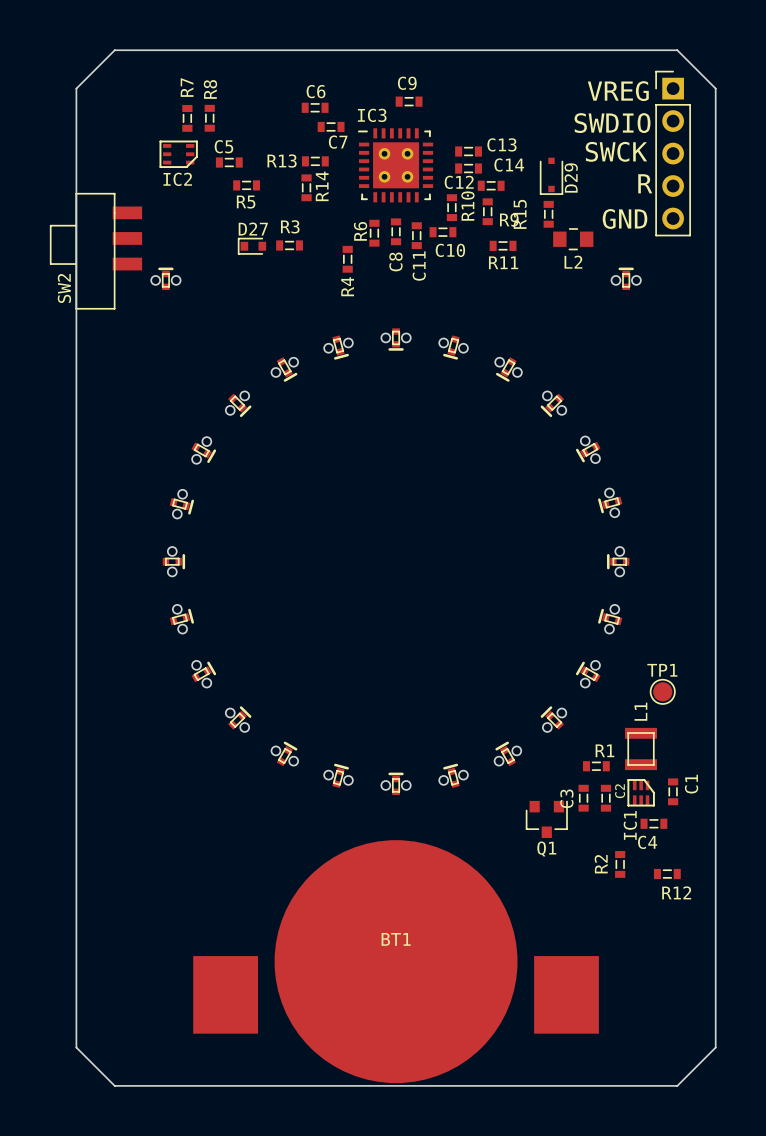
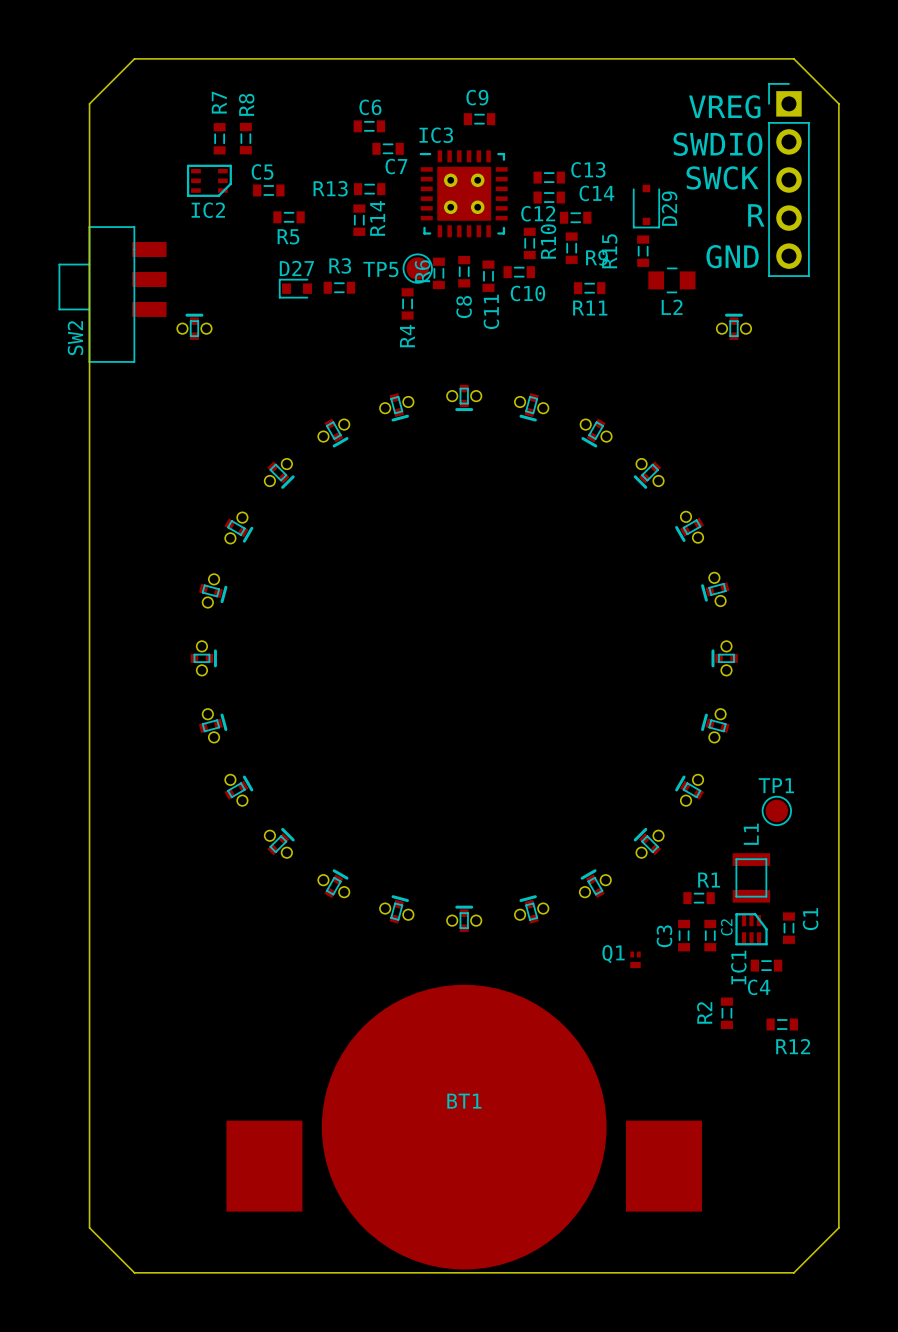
TP5: none -> (417, 268)
Q1 footprint: [525, 800, 568, 838] -> [630, 951, 641, 968]
Q1 name position: Q1 (546, 849) -> Q1 (613, 954)

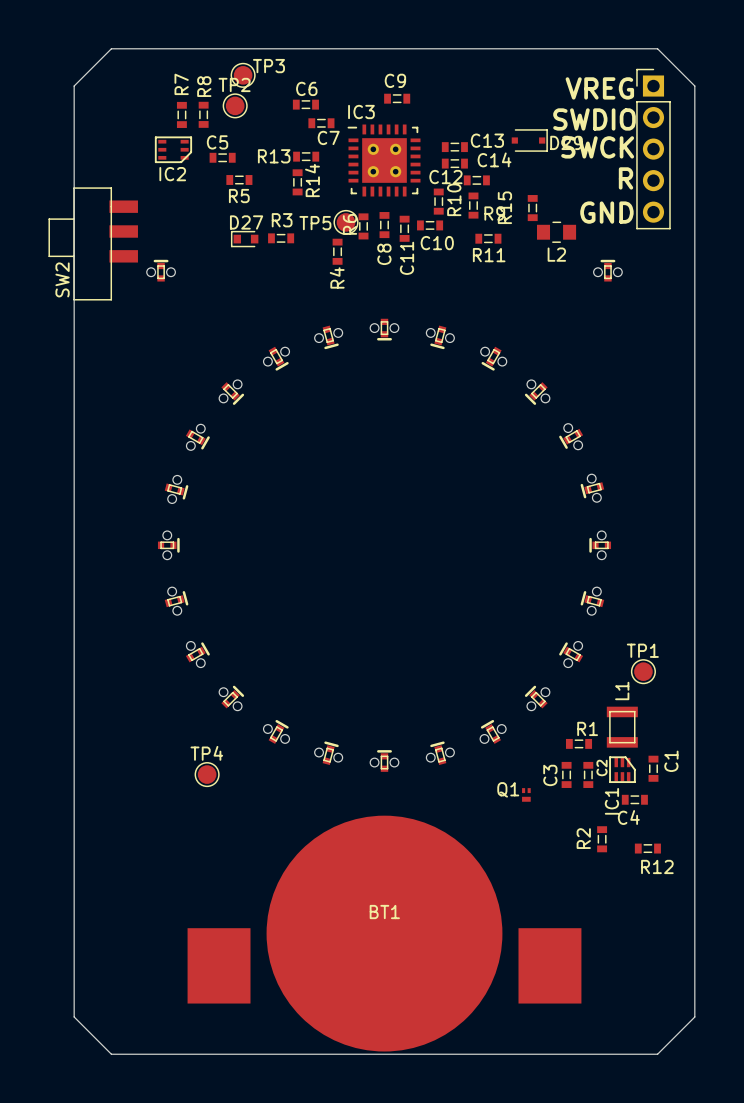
TP3: none -> (243, 75)
TP2: none -> (235, 105)
D29 rotation: 0° (646, 206) -> 90° counterclockwise (529, 140)
D29 position: (646, 206) -> (529, 140)
TP4: none -> (207, 774)

